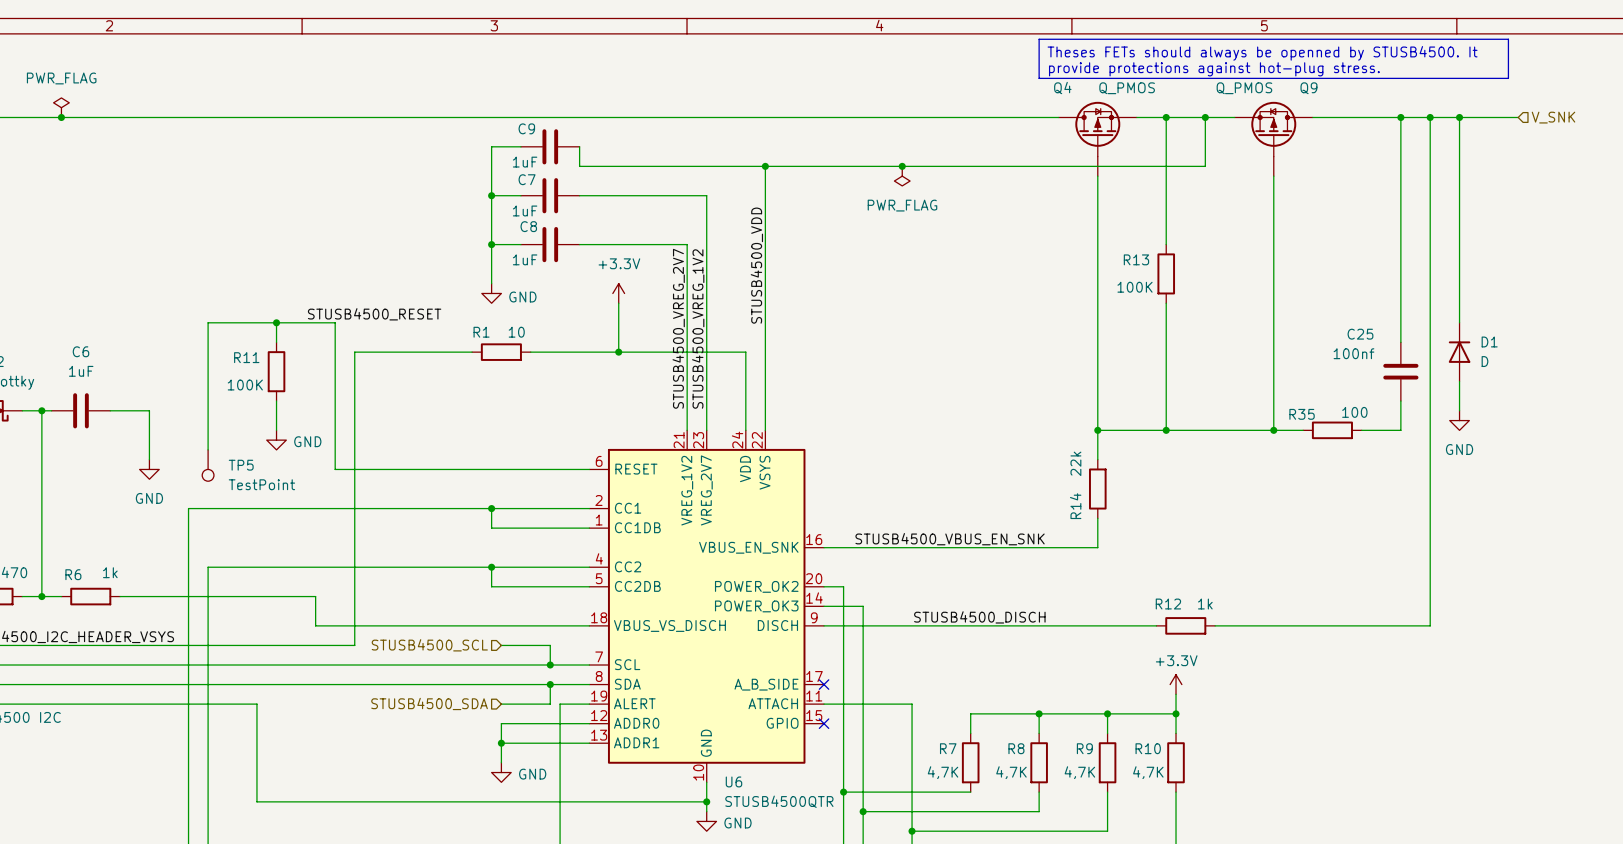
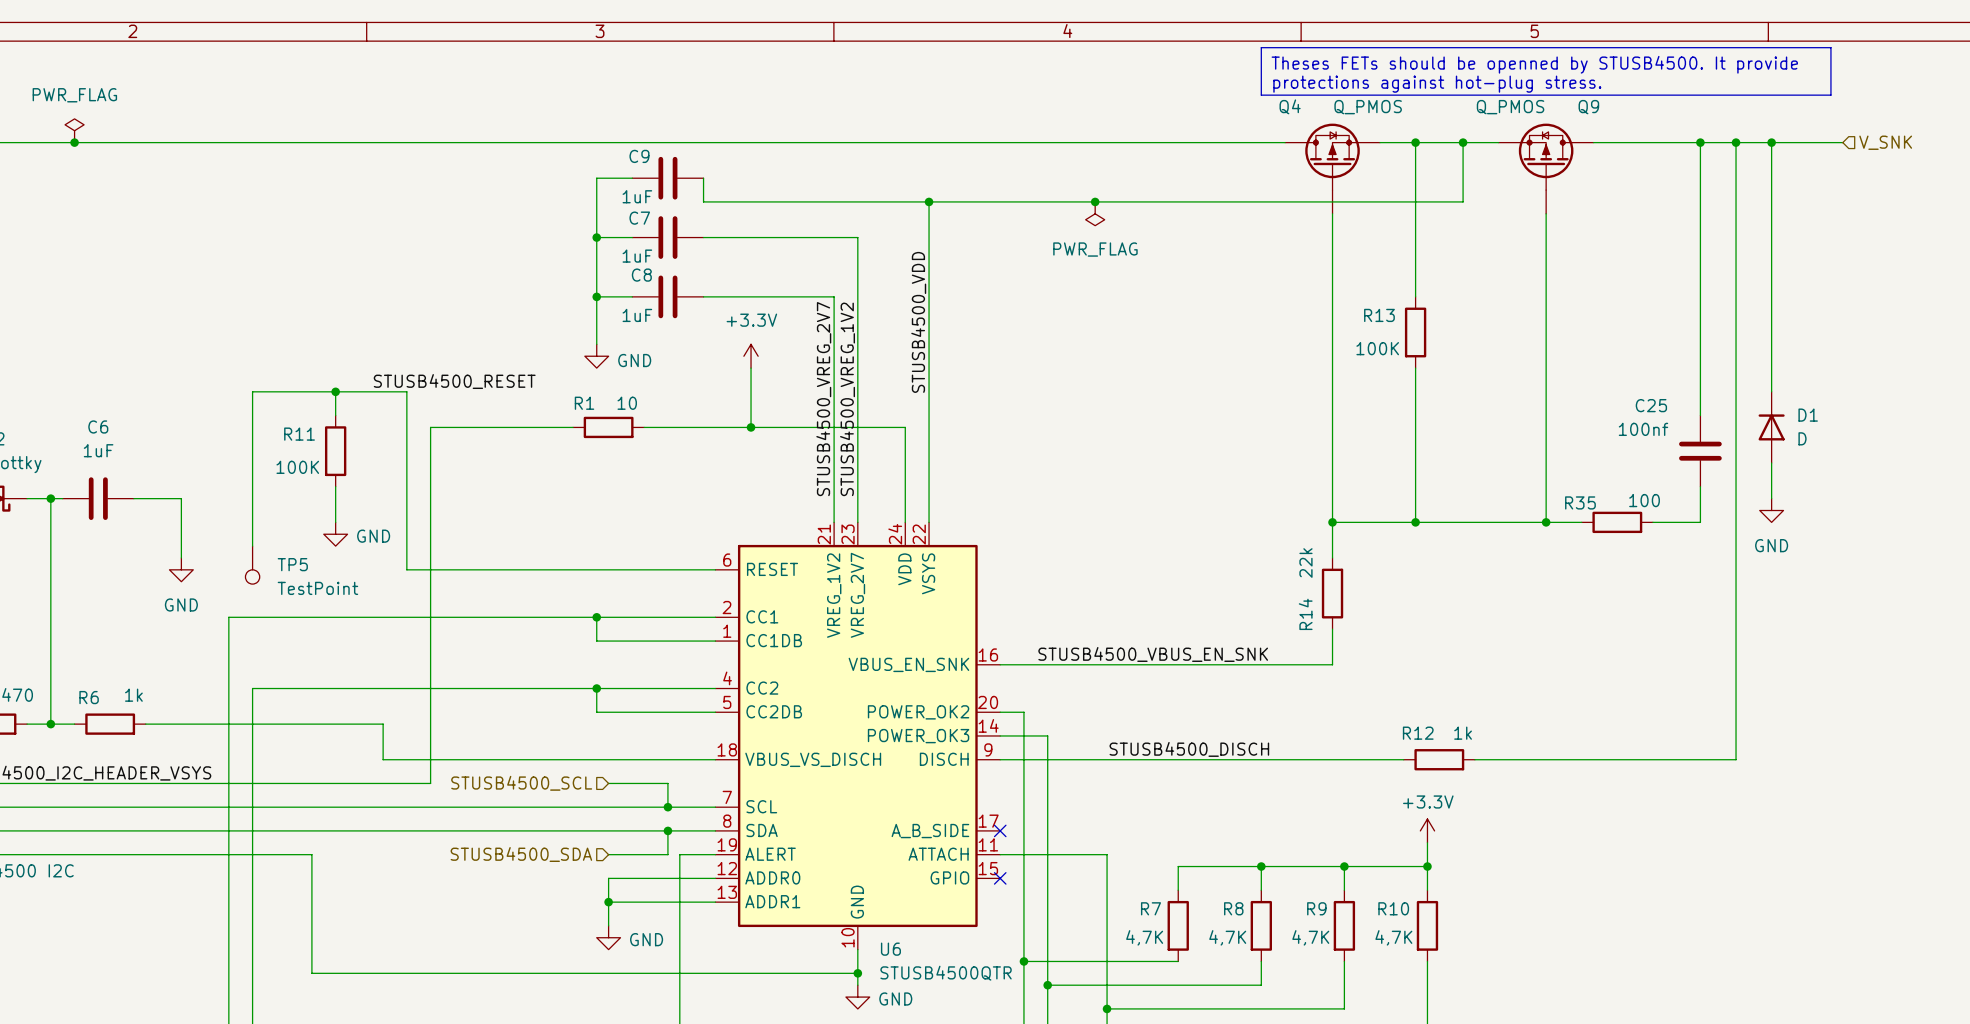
text: Theses FETs should always be openned by STUSB4500. It (1262, 53) -> Theses FETs should be openned by STUSB4500. It provide (1534, 64)
text: provide protections against hot-plug stress. (1214, 69) -> protections against hot-plug stress. (1437, 84)

